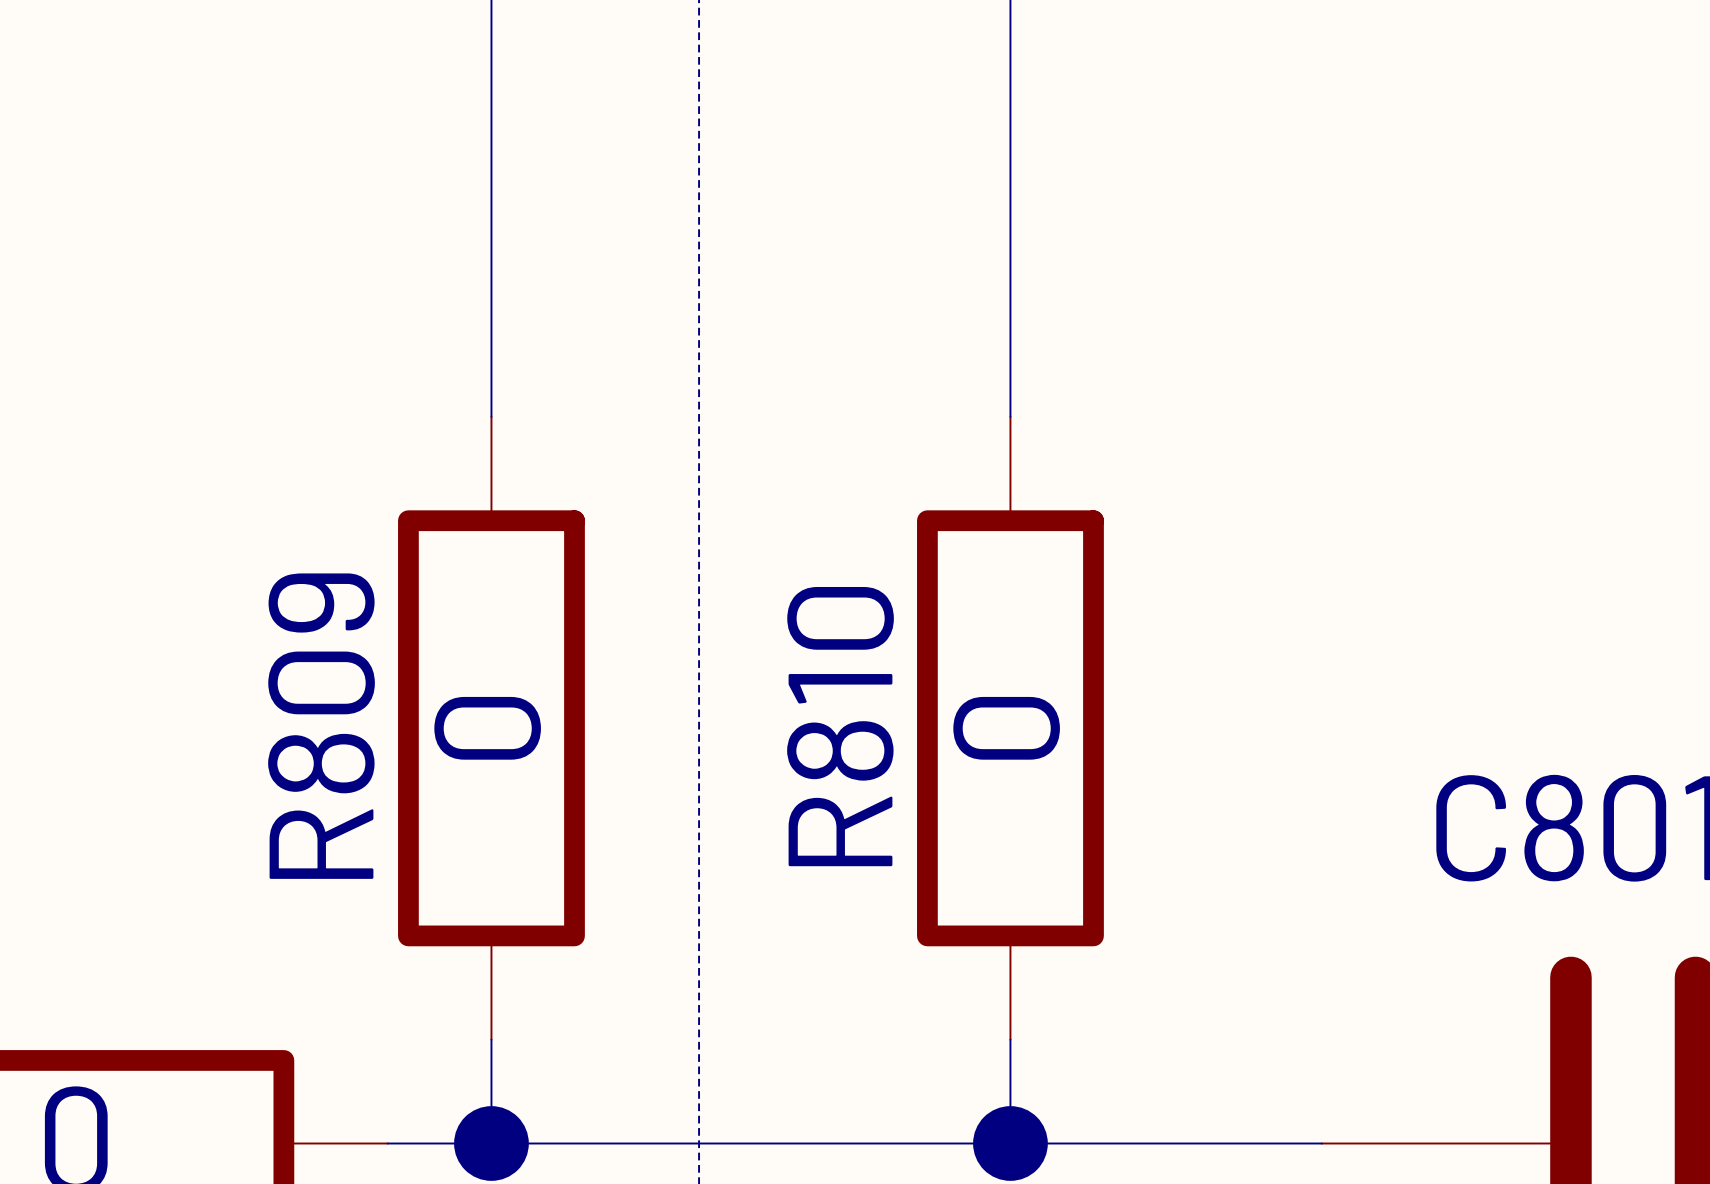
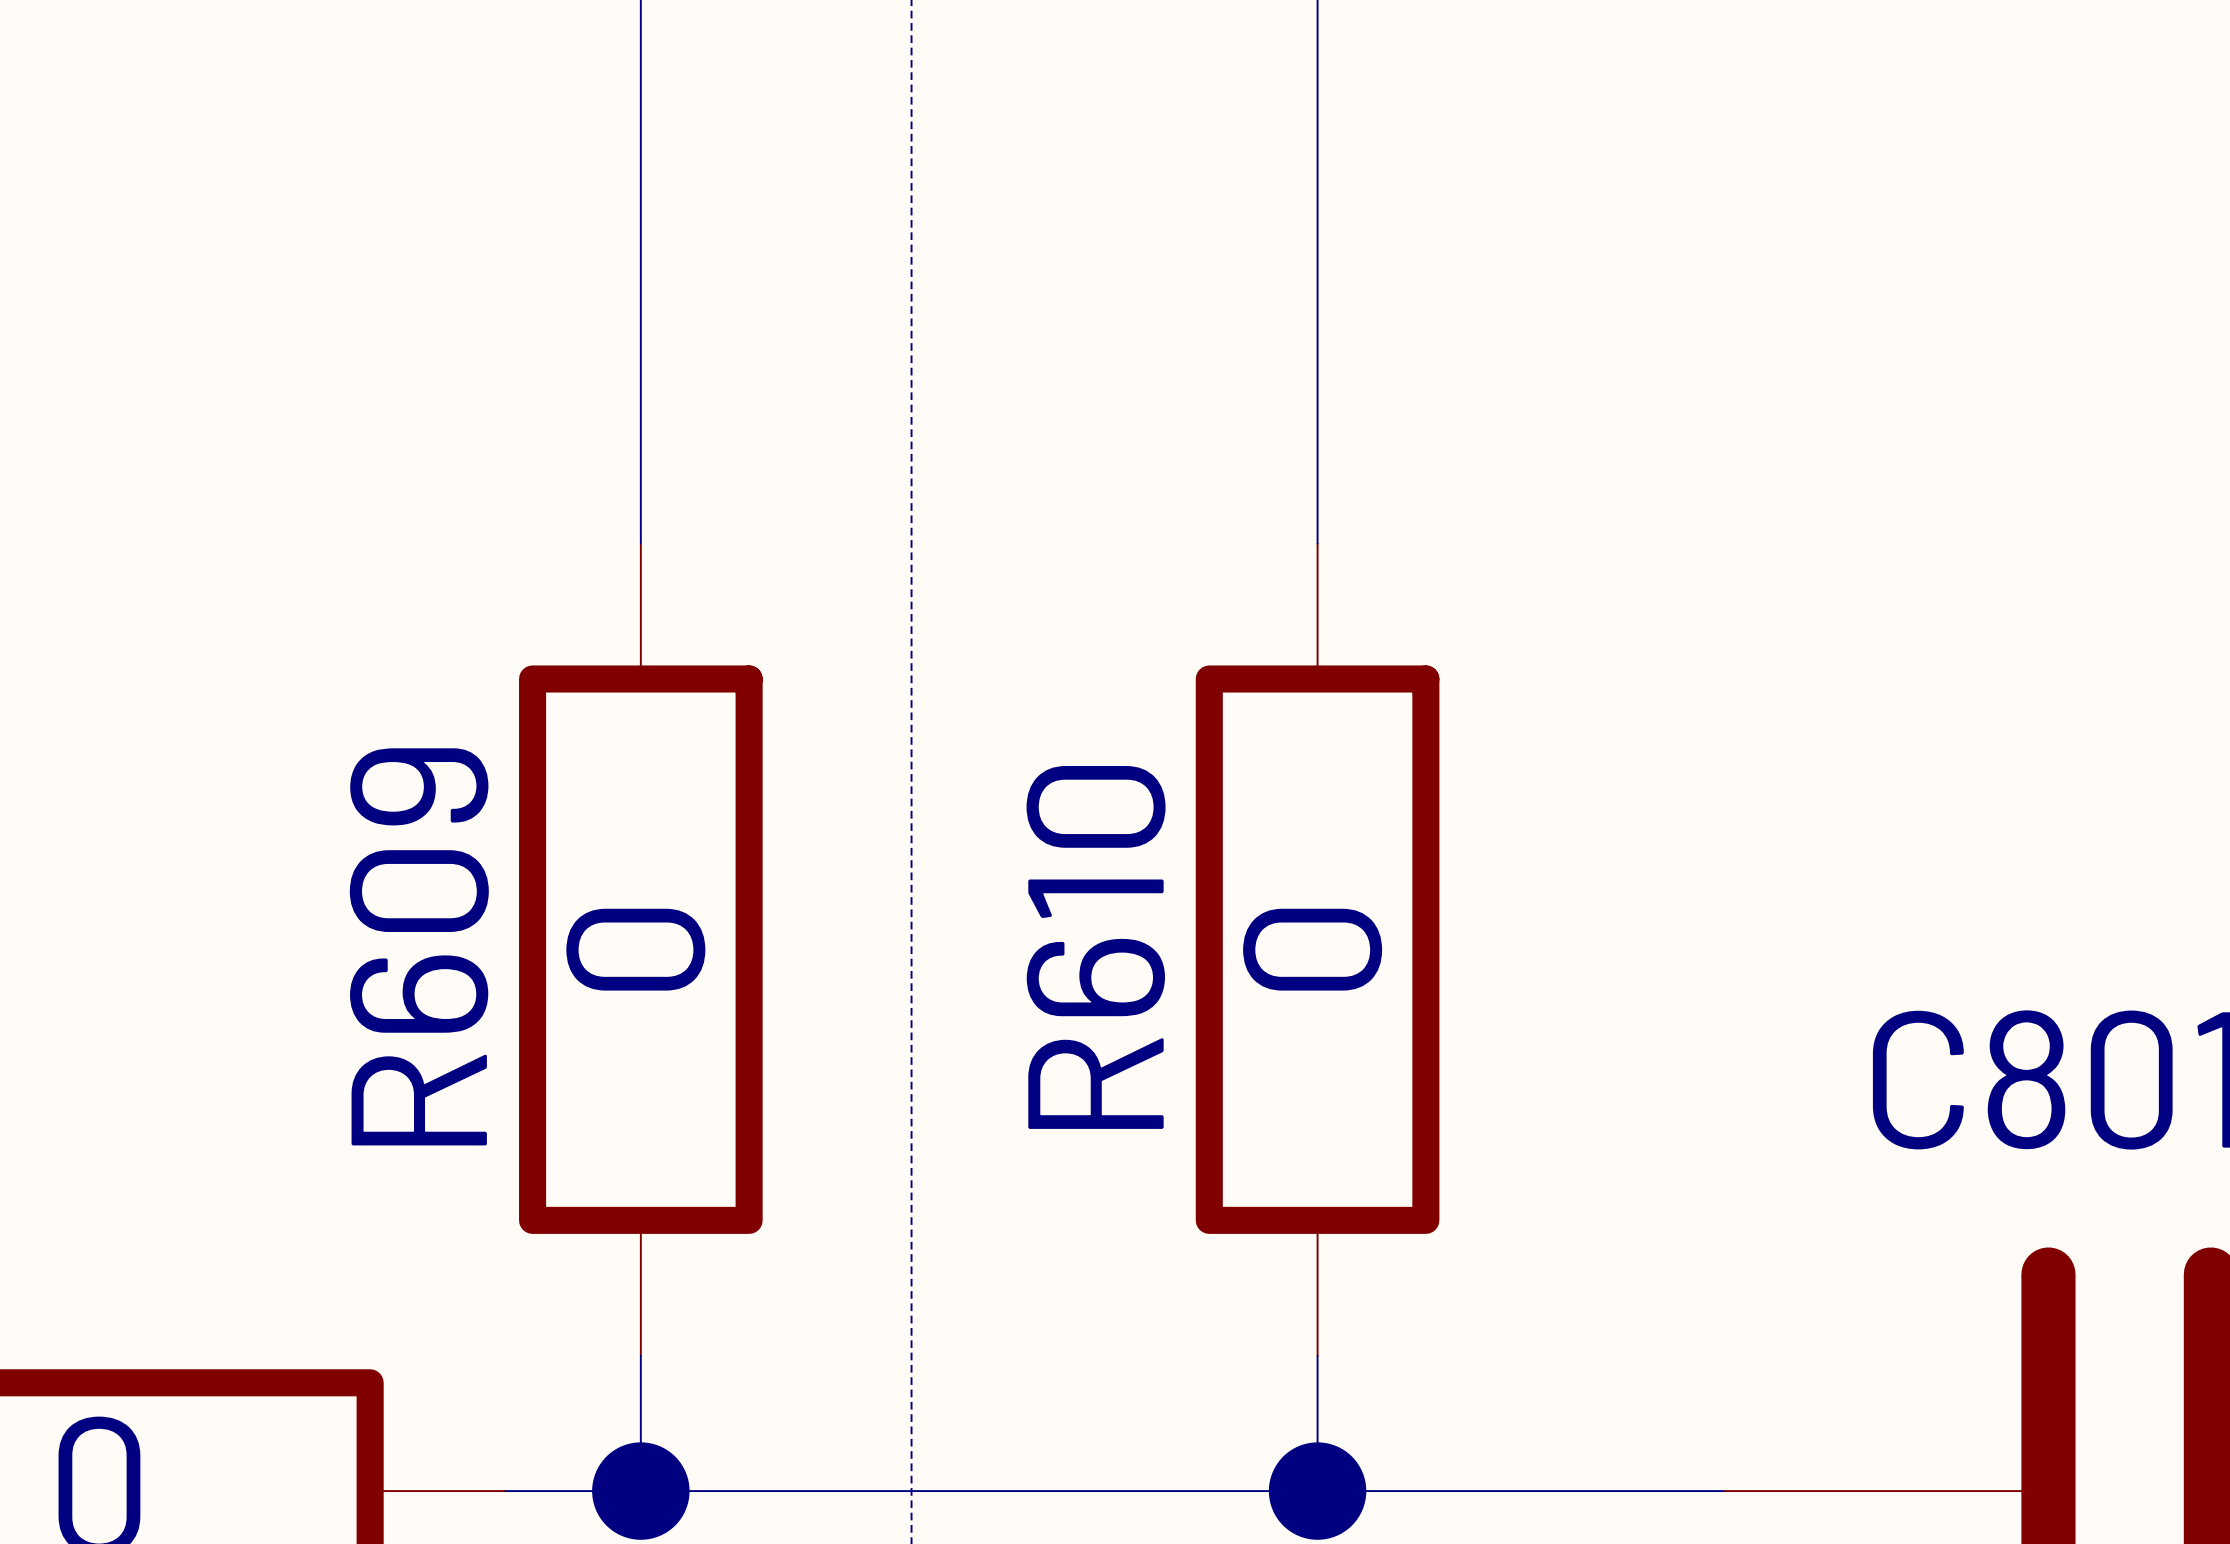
R809 name: R809 (321, 726) -> R609 (419, 946)
R810 name: R810 (840, 726) -> R610 (1096, 947)

